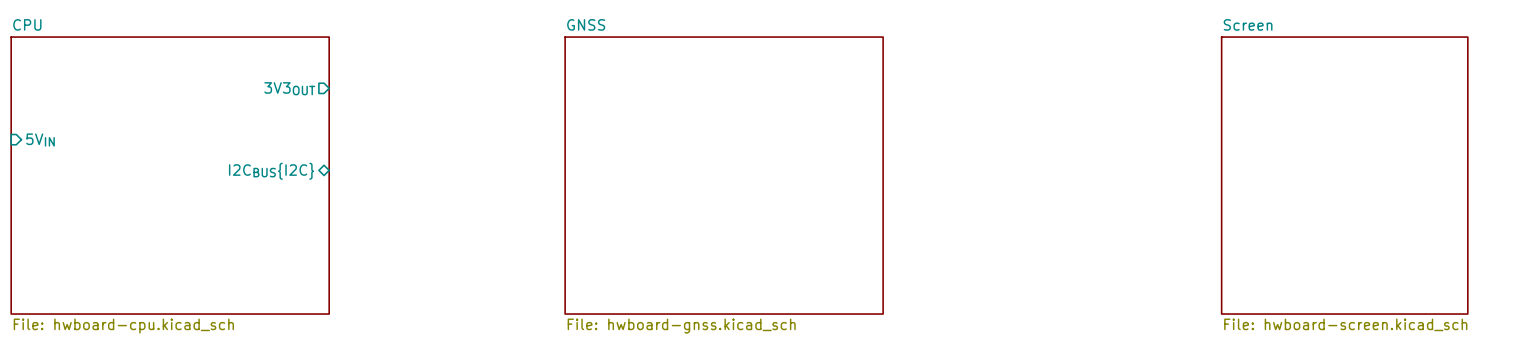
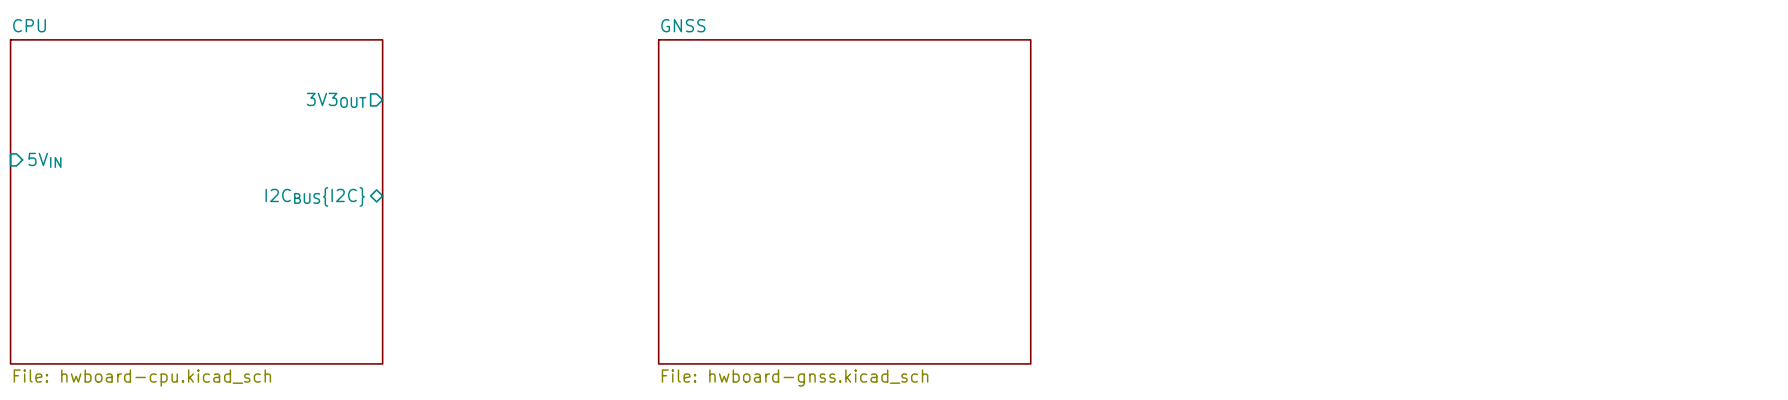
sheet Screen: File: hwboard-screen.kicad_sch (1344, 175) -> none

